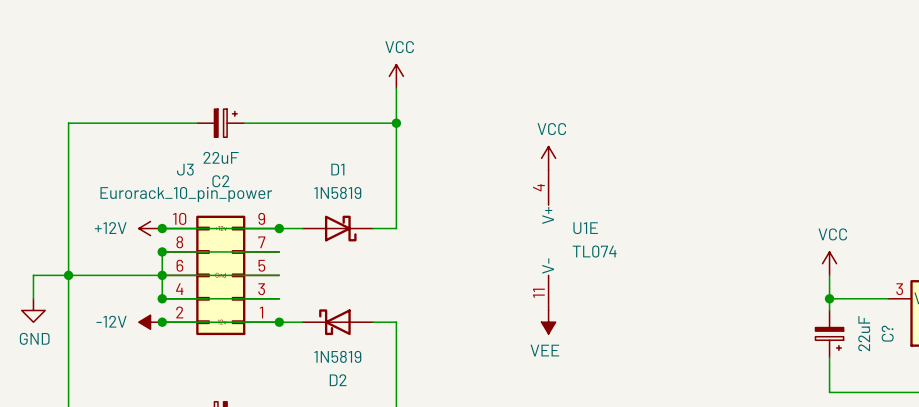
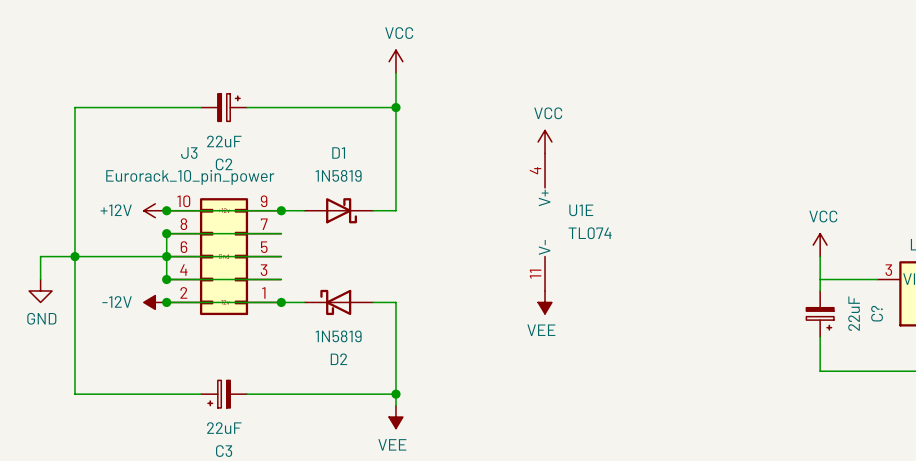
junction: (829, 298) -> none

